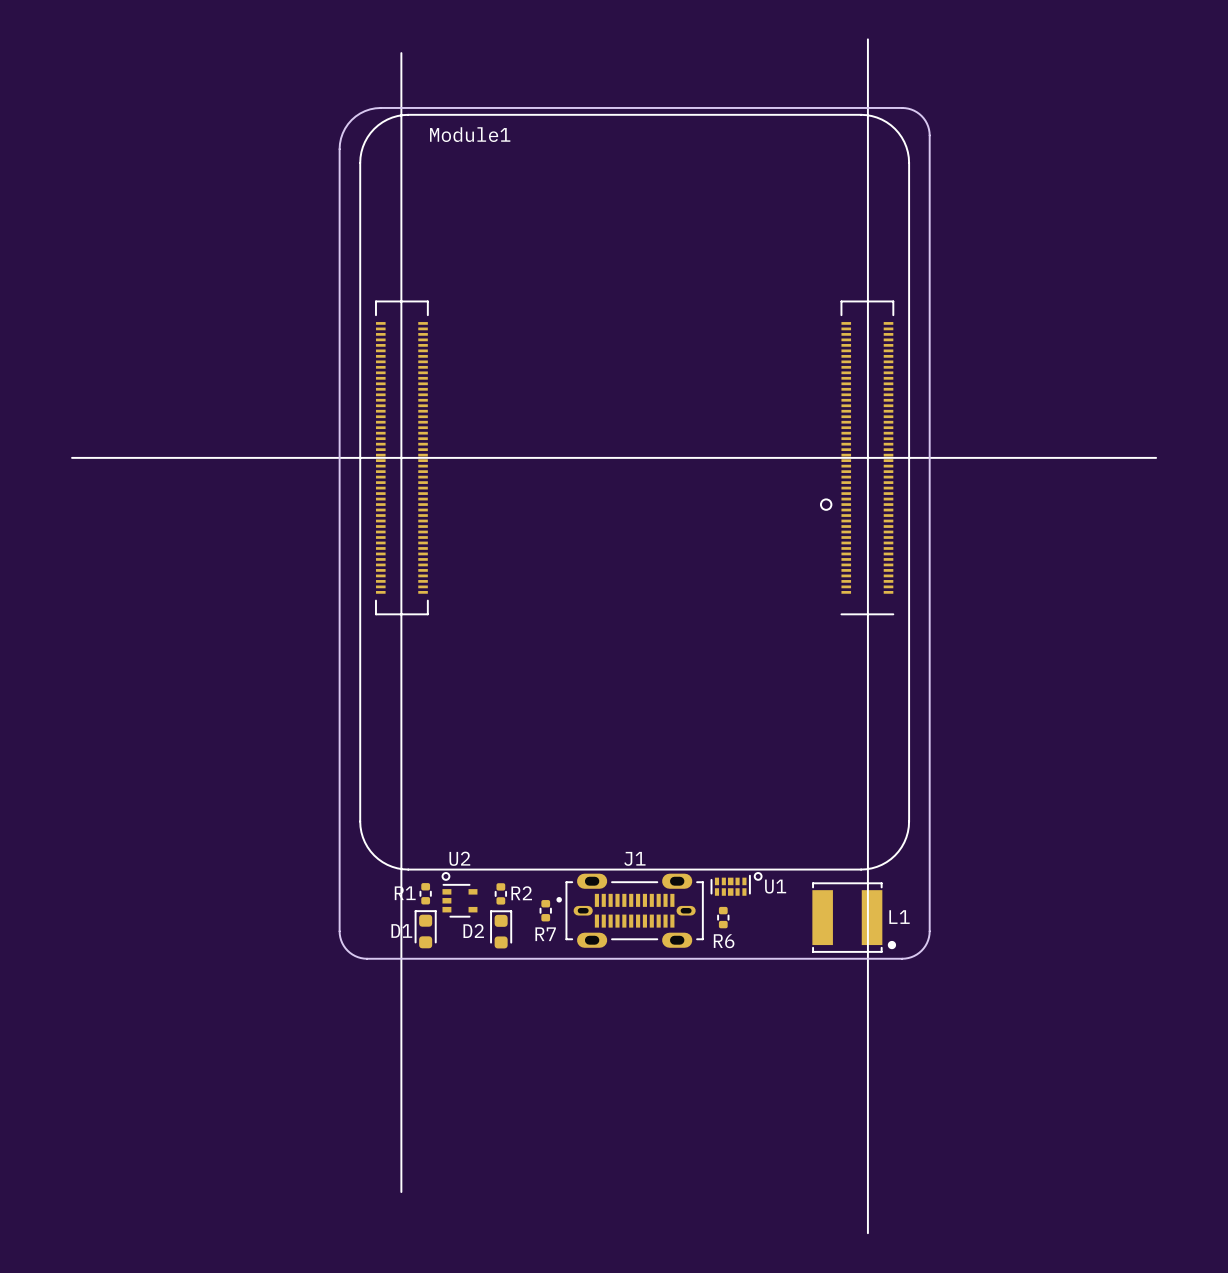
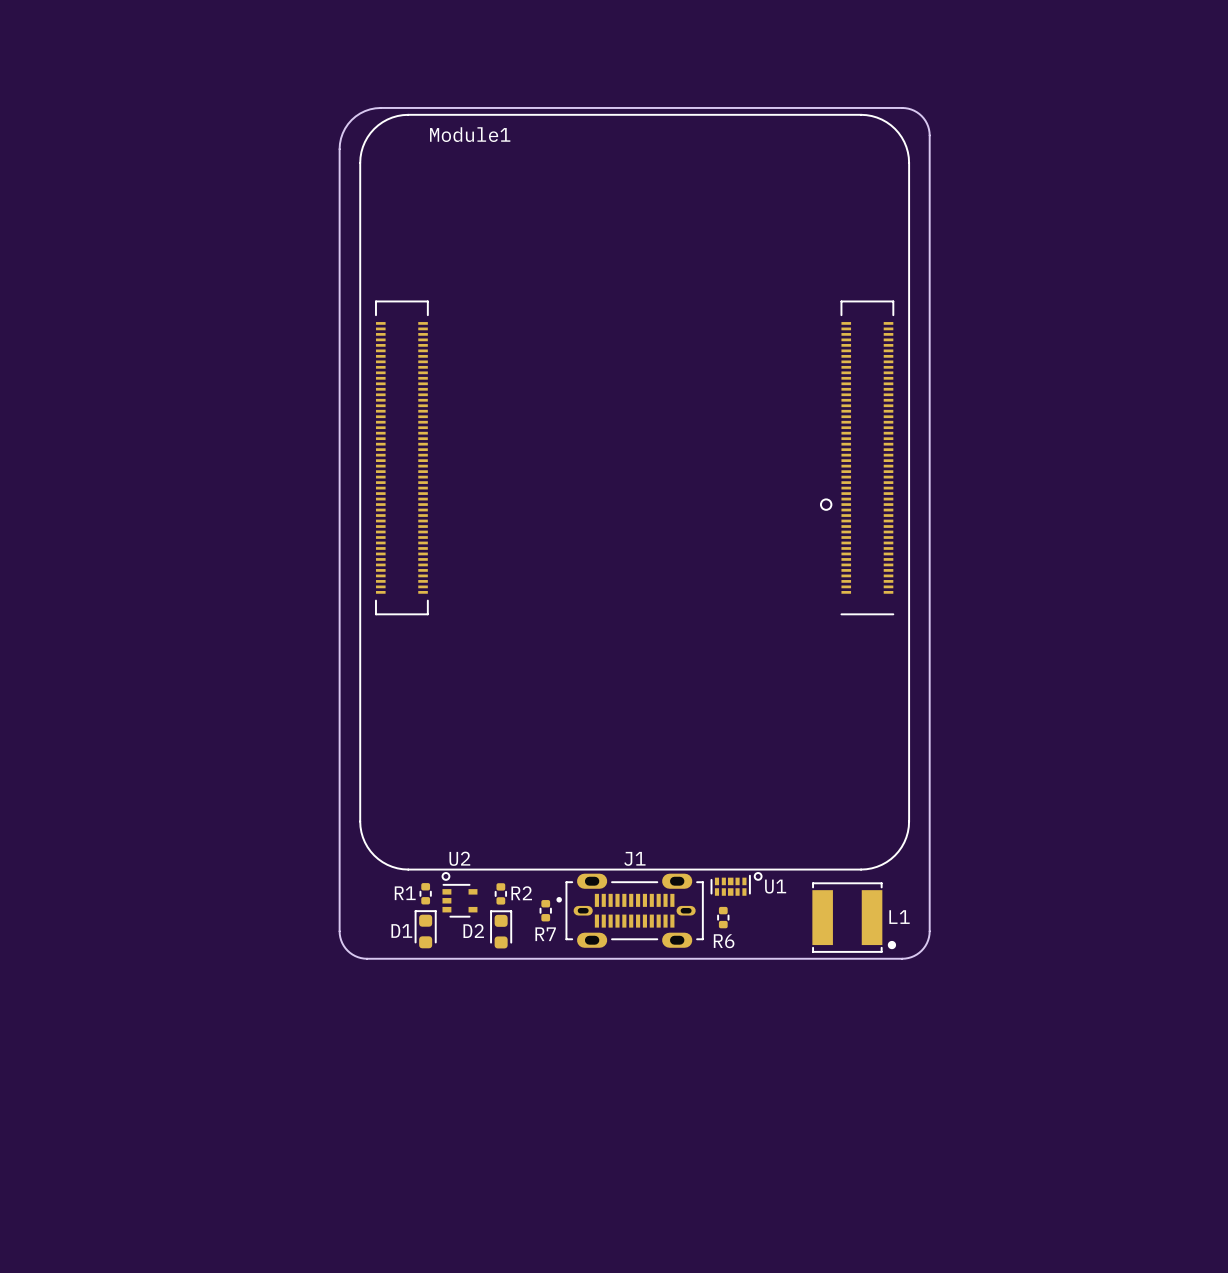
line: (867, 39) (867, 1233) -> none
line: (401, 53) (401, 1192) -> none
line: (72, 457) (1156, 457) -> none

